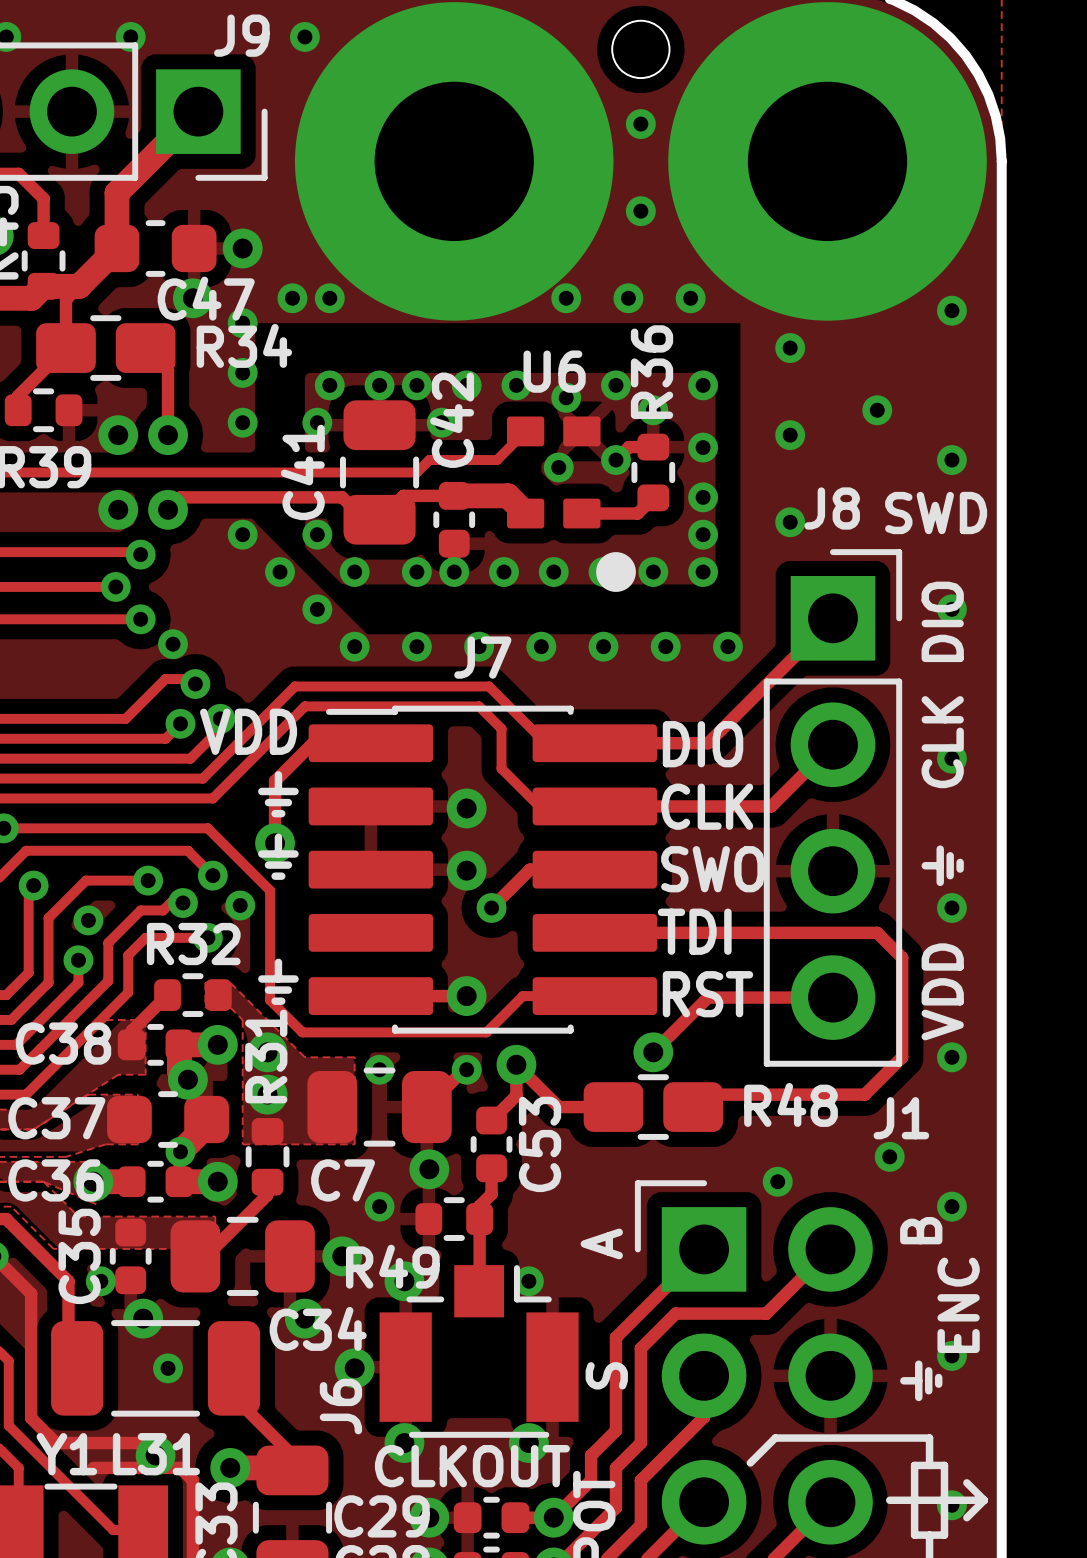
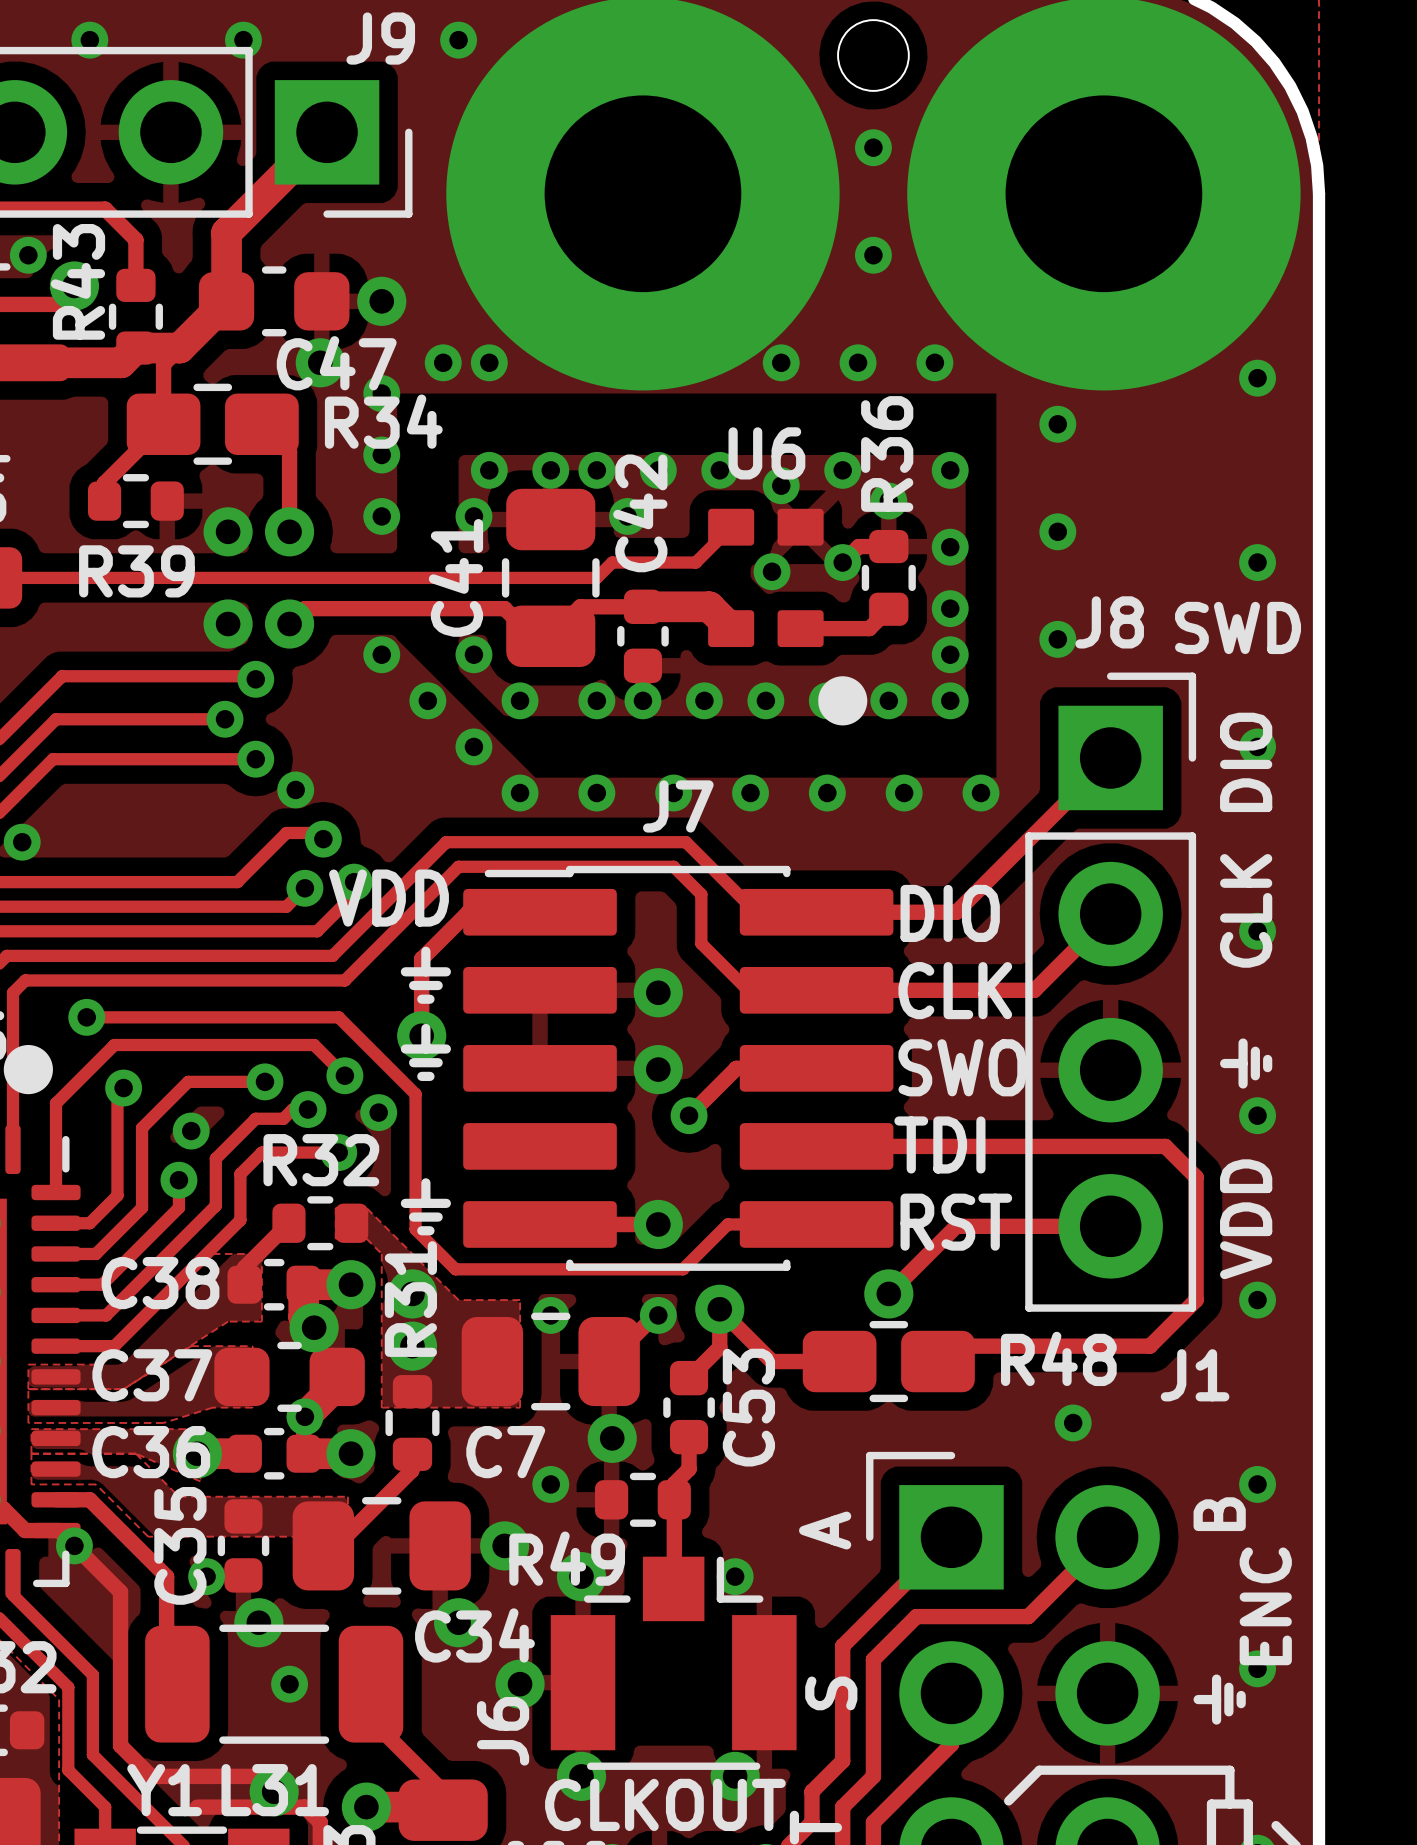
via: (877, 410) -> none
via: (889, 1156) -> none
via position: (777, 1181) -> (1073, 1422)

